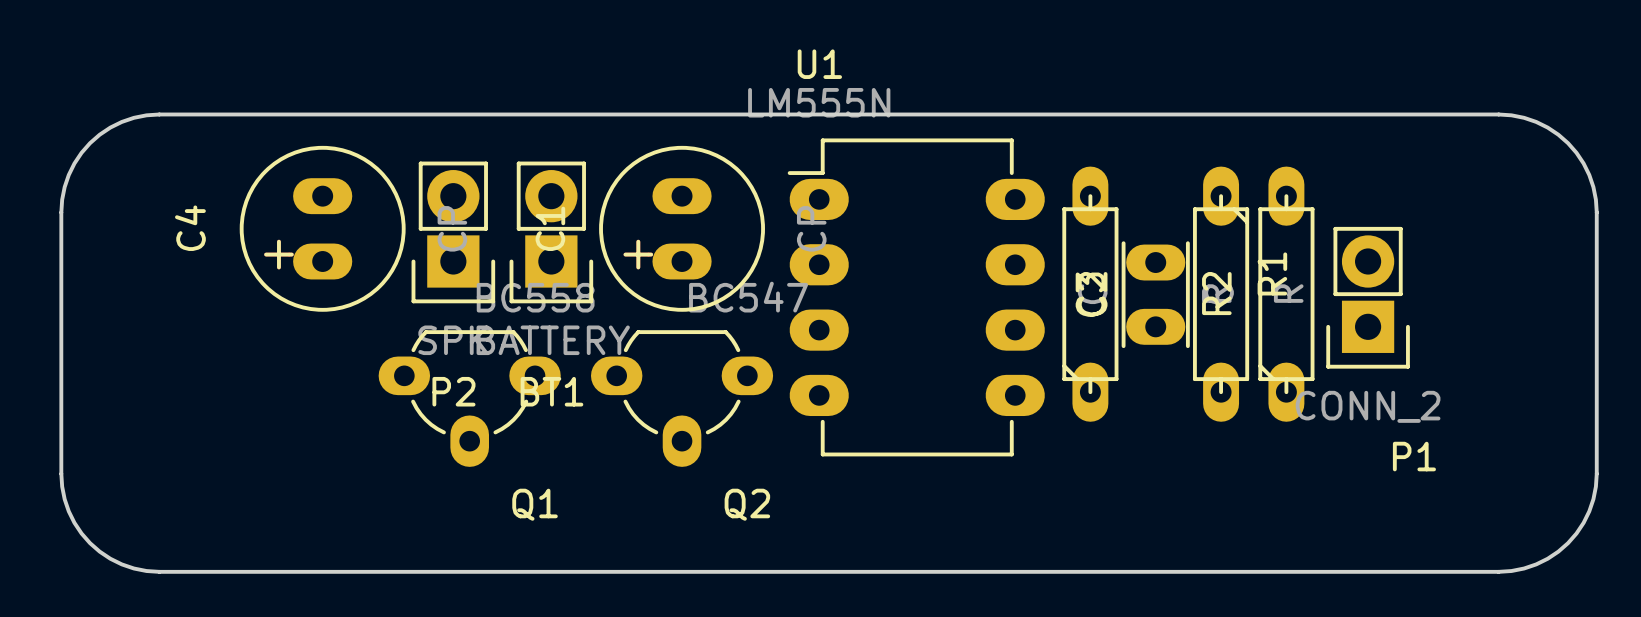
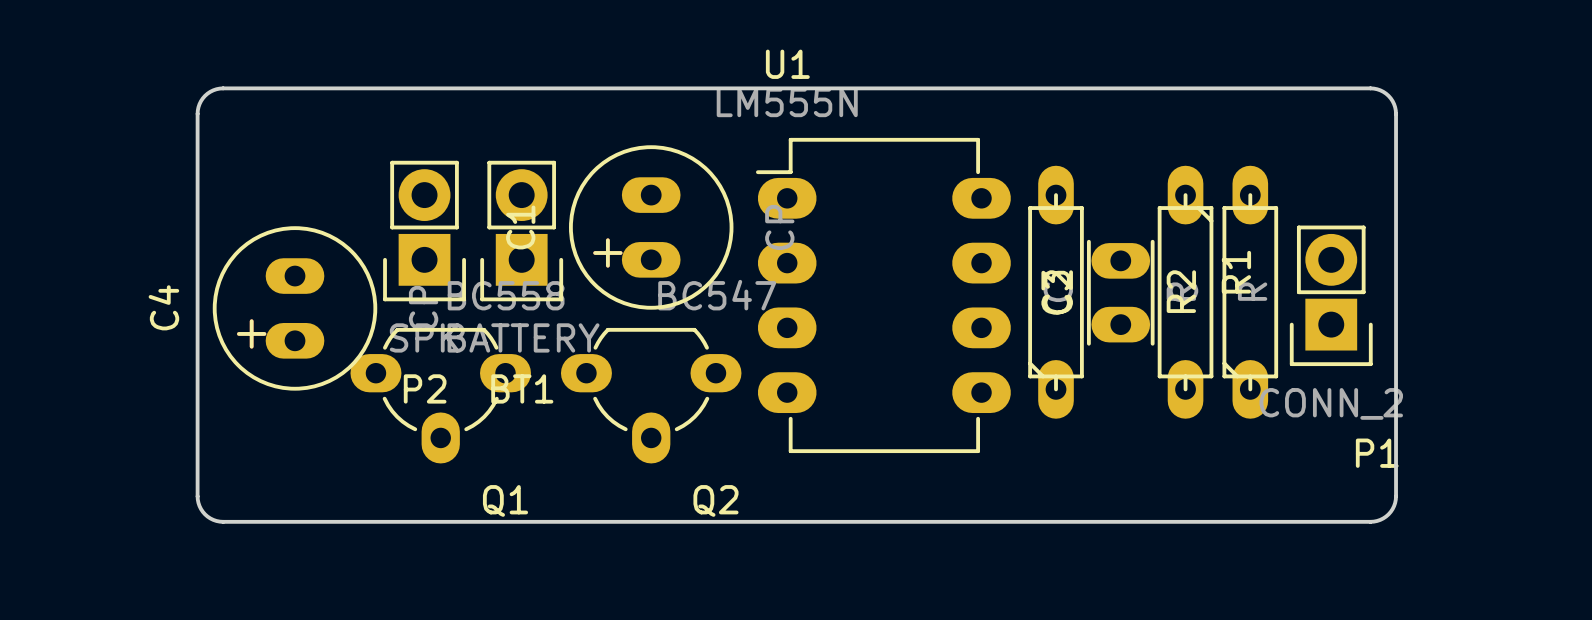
board edge: (159, 114) (1498, 114) (1524, 117) (1547, 127) (1568, 143) (1583, 163) (1593, 187) (1595, 199) (1596, 473) (1593, 499) (1583, 522) (1568, 543) (1558, 551) (1536, 564) (1511, 571) (1498, 571) (159, 571) (133, 568) (110, 558) (90, 543) (74, 522) (64, 499) (61, 473) (61, 212) (62, 199) (68, 174) (74, 163) (90, 143) (110, 127) (121, 121) (146, 115) (159, 114) -> (223, 88) (213, 90) (205, 95) (199, 104) (197, 113) (197, 496) (202, 511) (213, 519) (223, 521) (1370, 521) (1386, 516) (1394, 506) (1396, 496) (1396, 113) (1390, 98) (1380, 90) (1370, 88) (223, 88)
C4 position: (322, 228) -> (295, 308)

